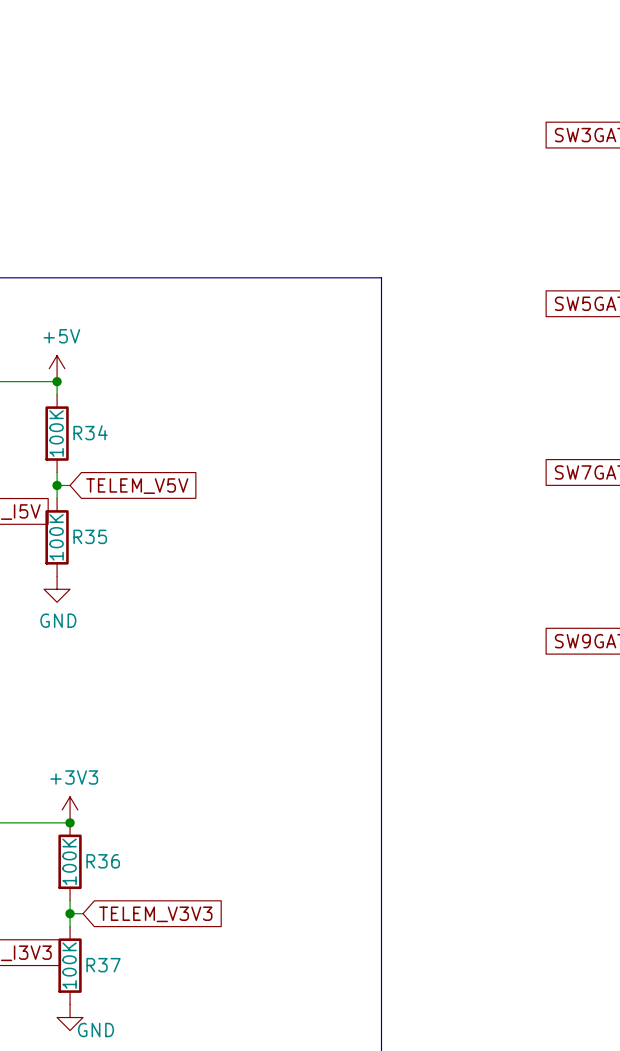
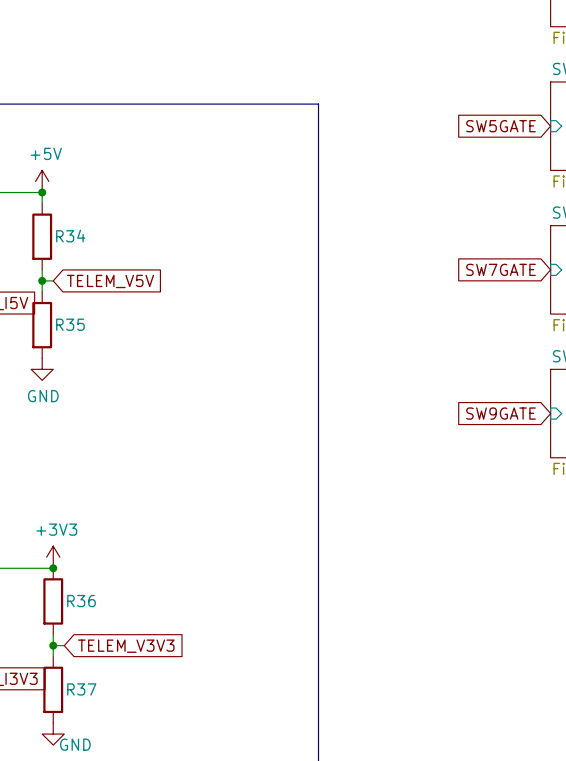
R34 value: 100K (56, 433) -> none
R35 value: 100K (56, 537) -> none
R36 value: 100K (69, 861) -> none
R37 value: 100K (69, 965) -> none

